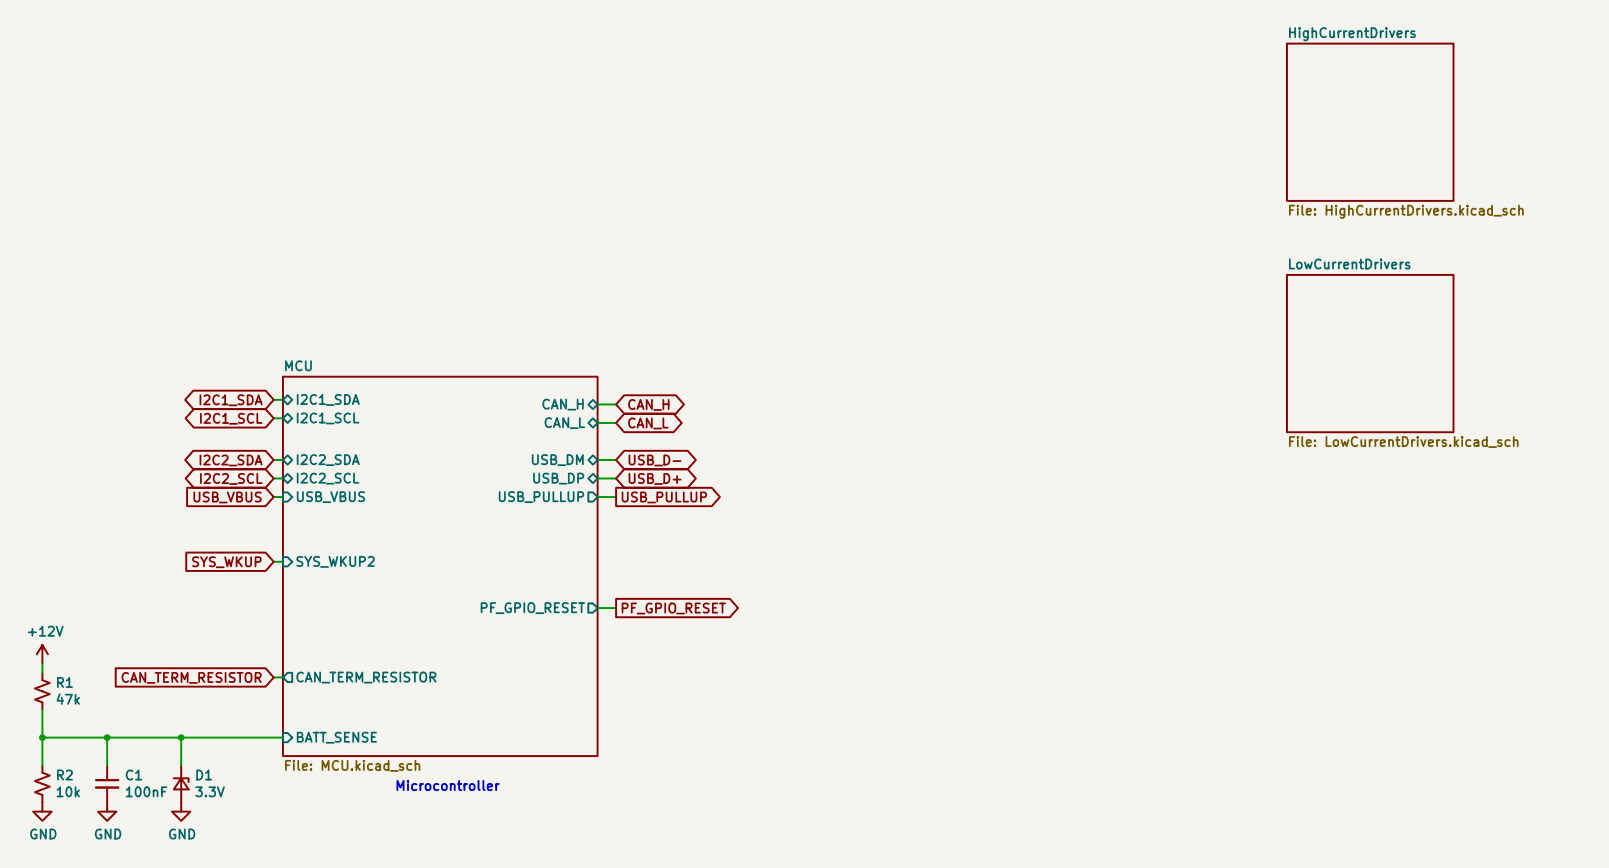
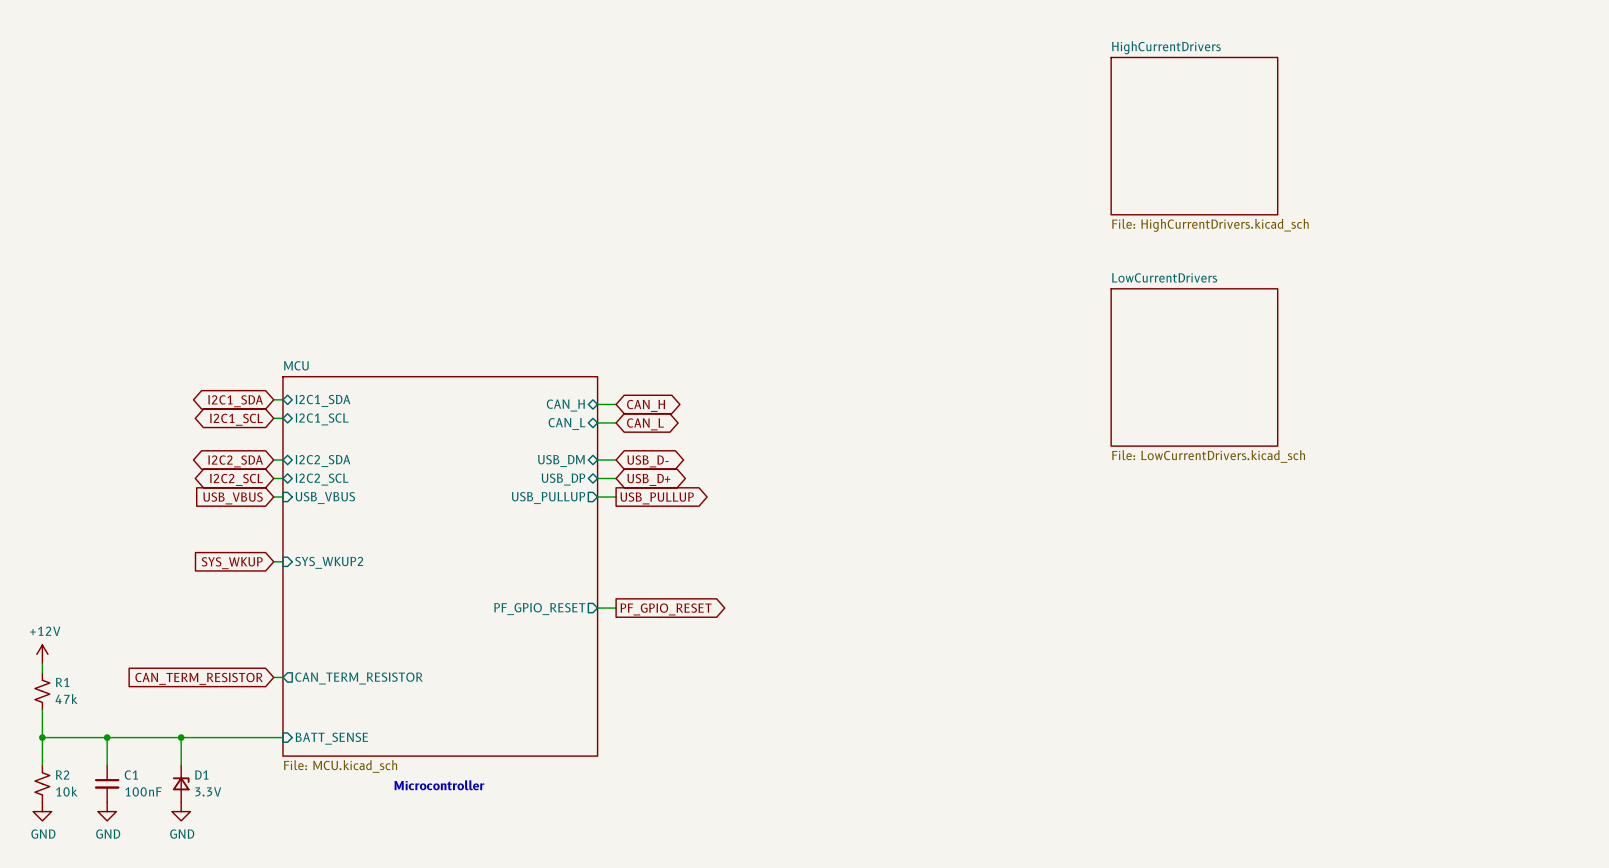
sheet HighCurrentDrivers position: (1370, 122) -> (1194, 136)
sheet LowCurrentDrivers position: (1370, 353) -> (1194, 367)

